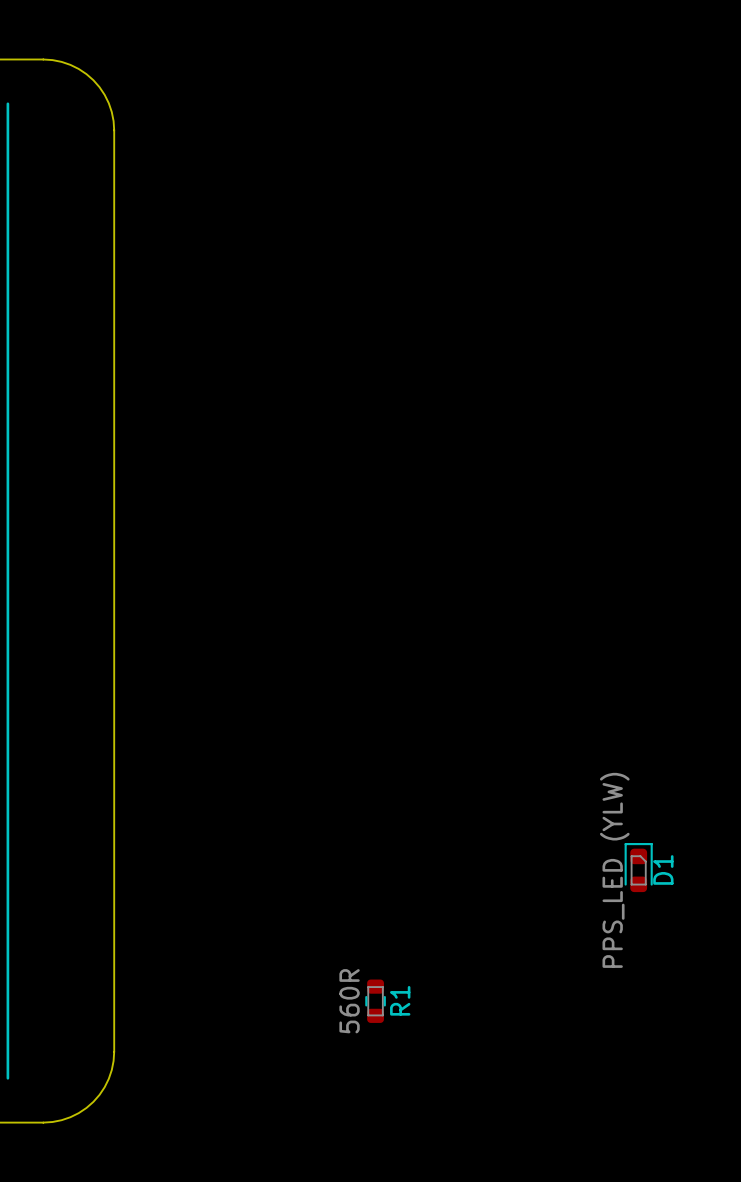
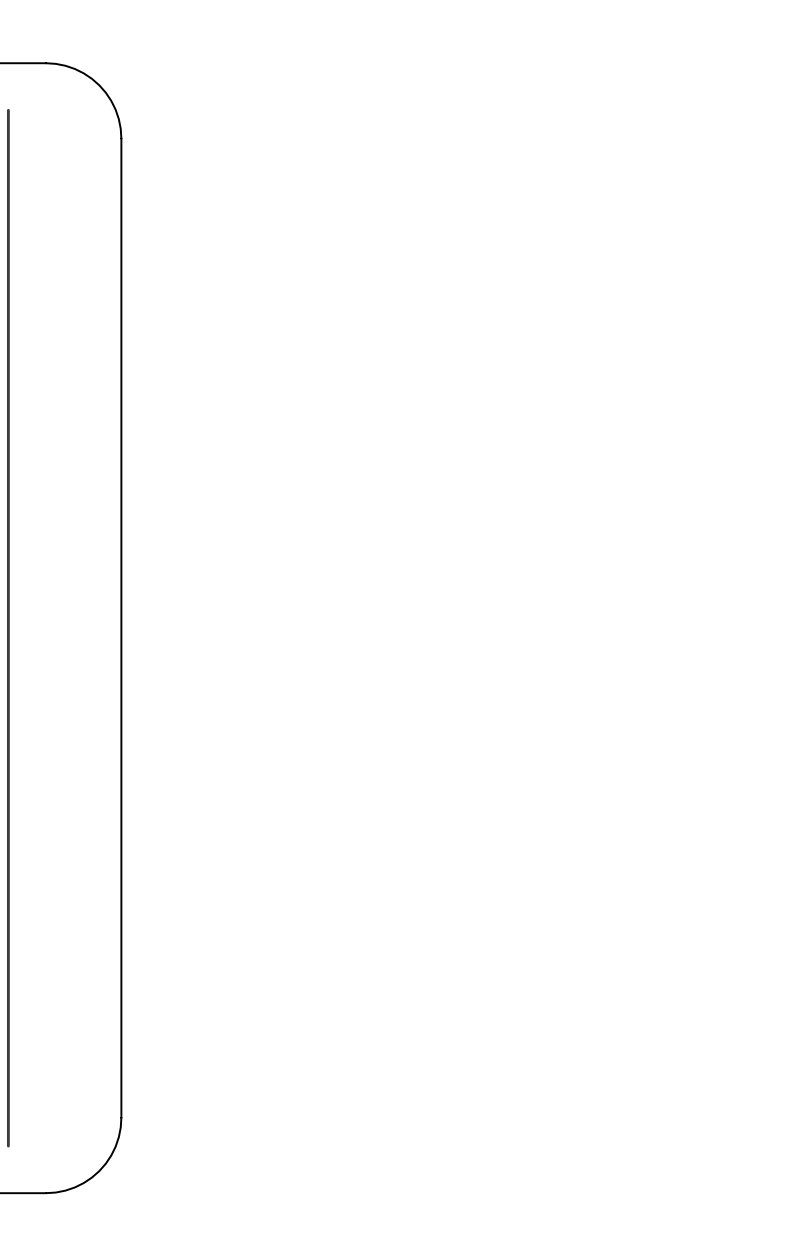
D1: PPS_LED (YLW) (638, 867) -> none
R1: 560R (375, 1001) -> none

